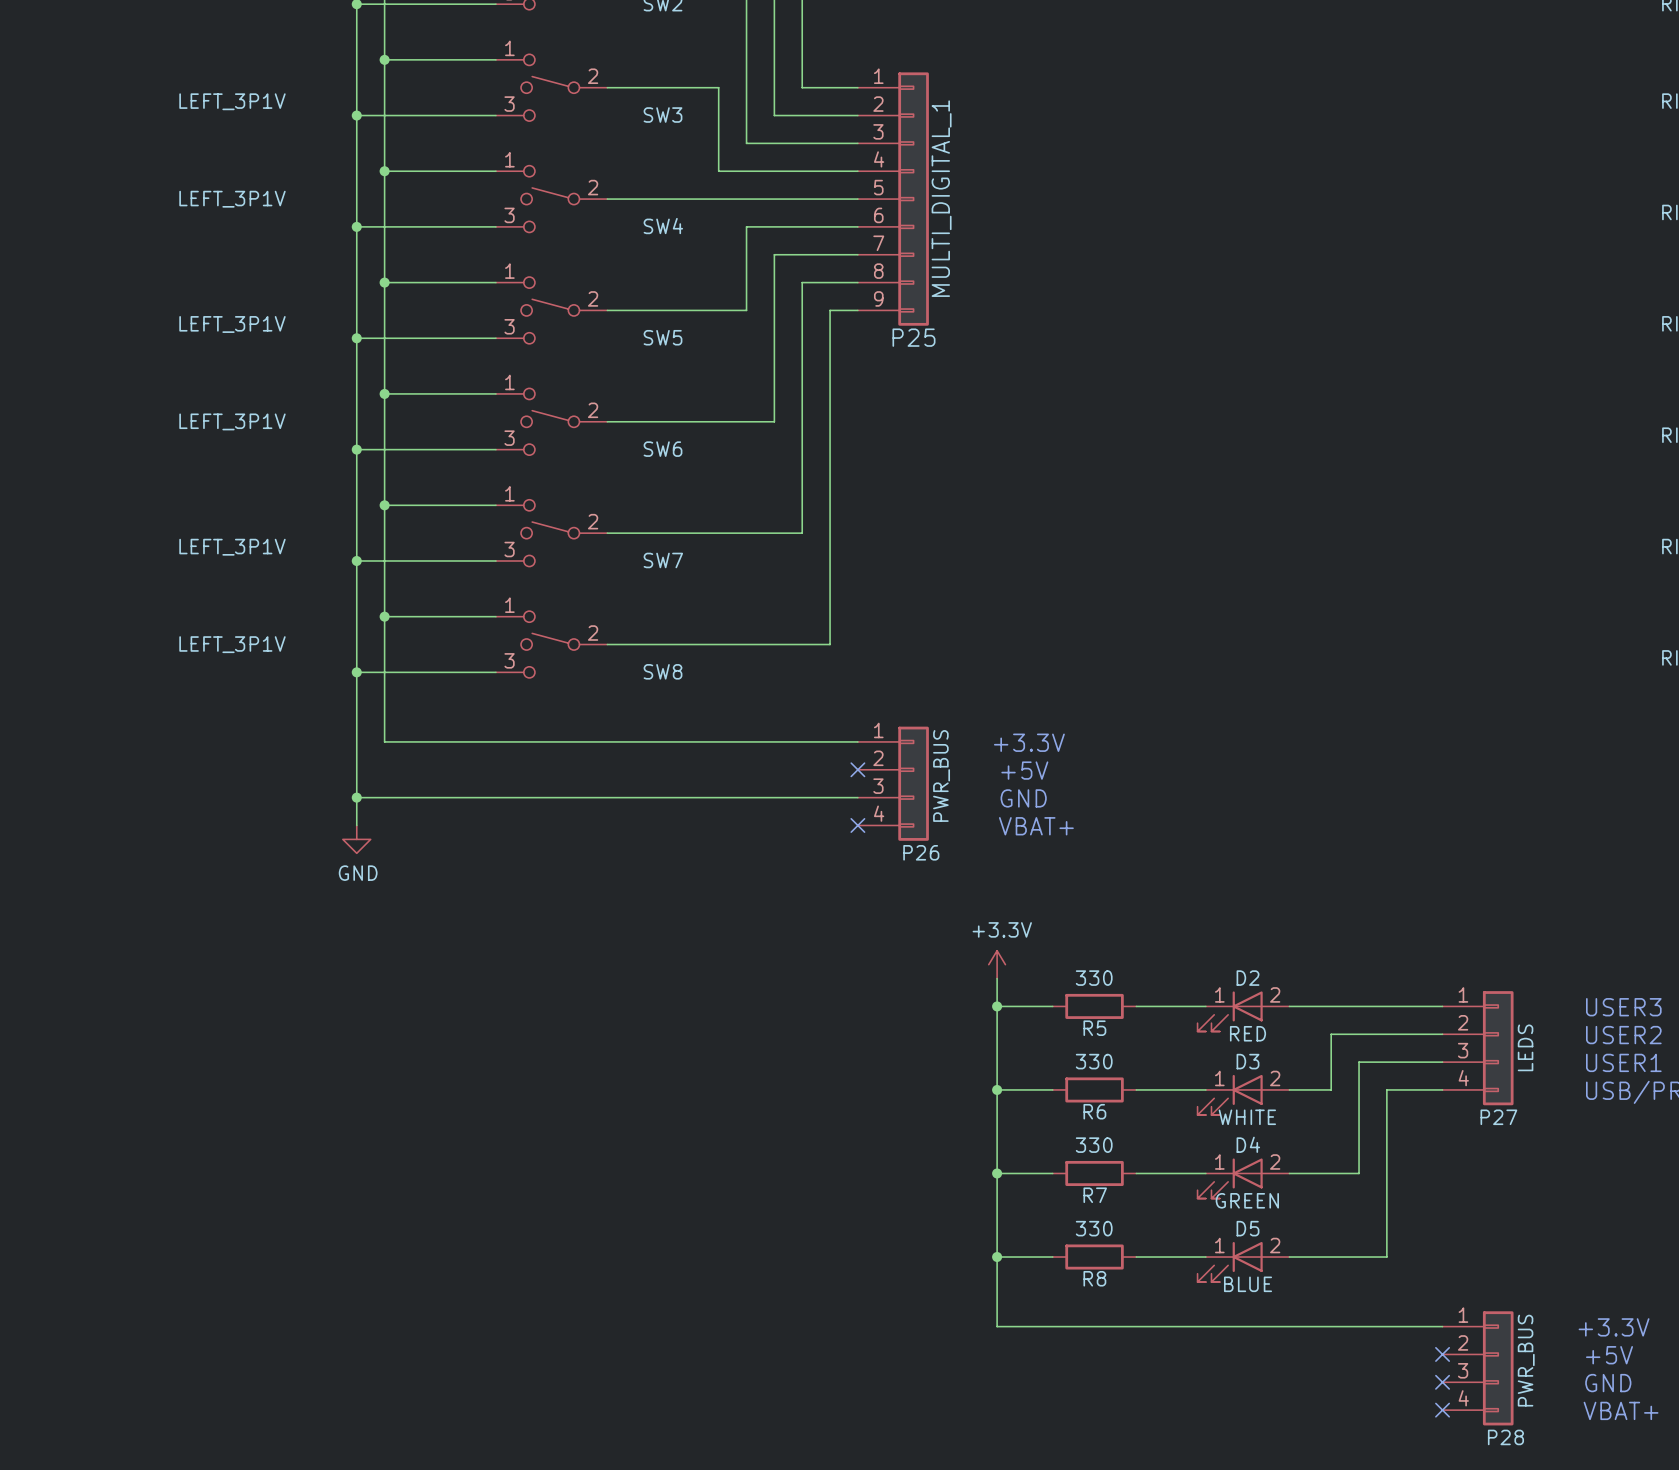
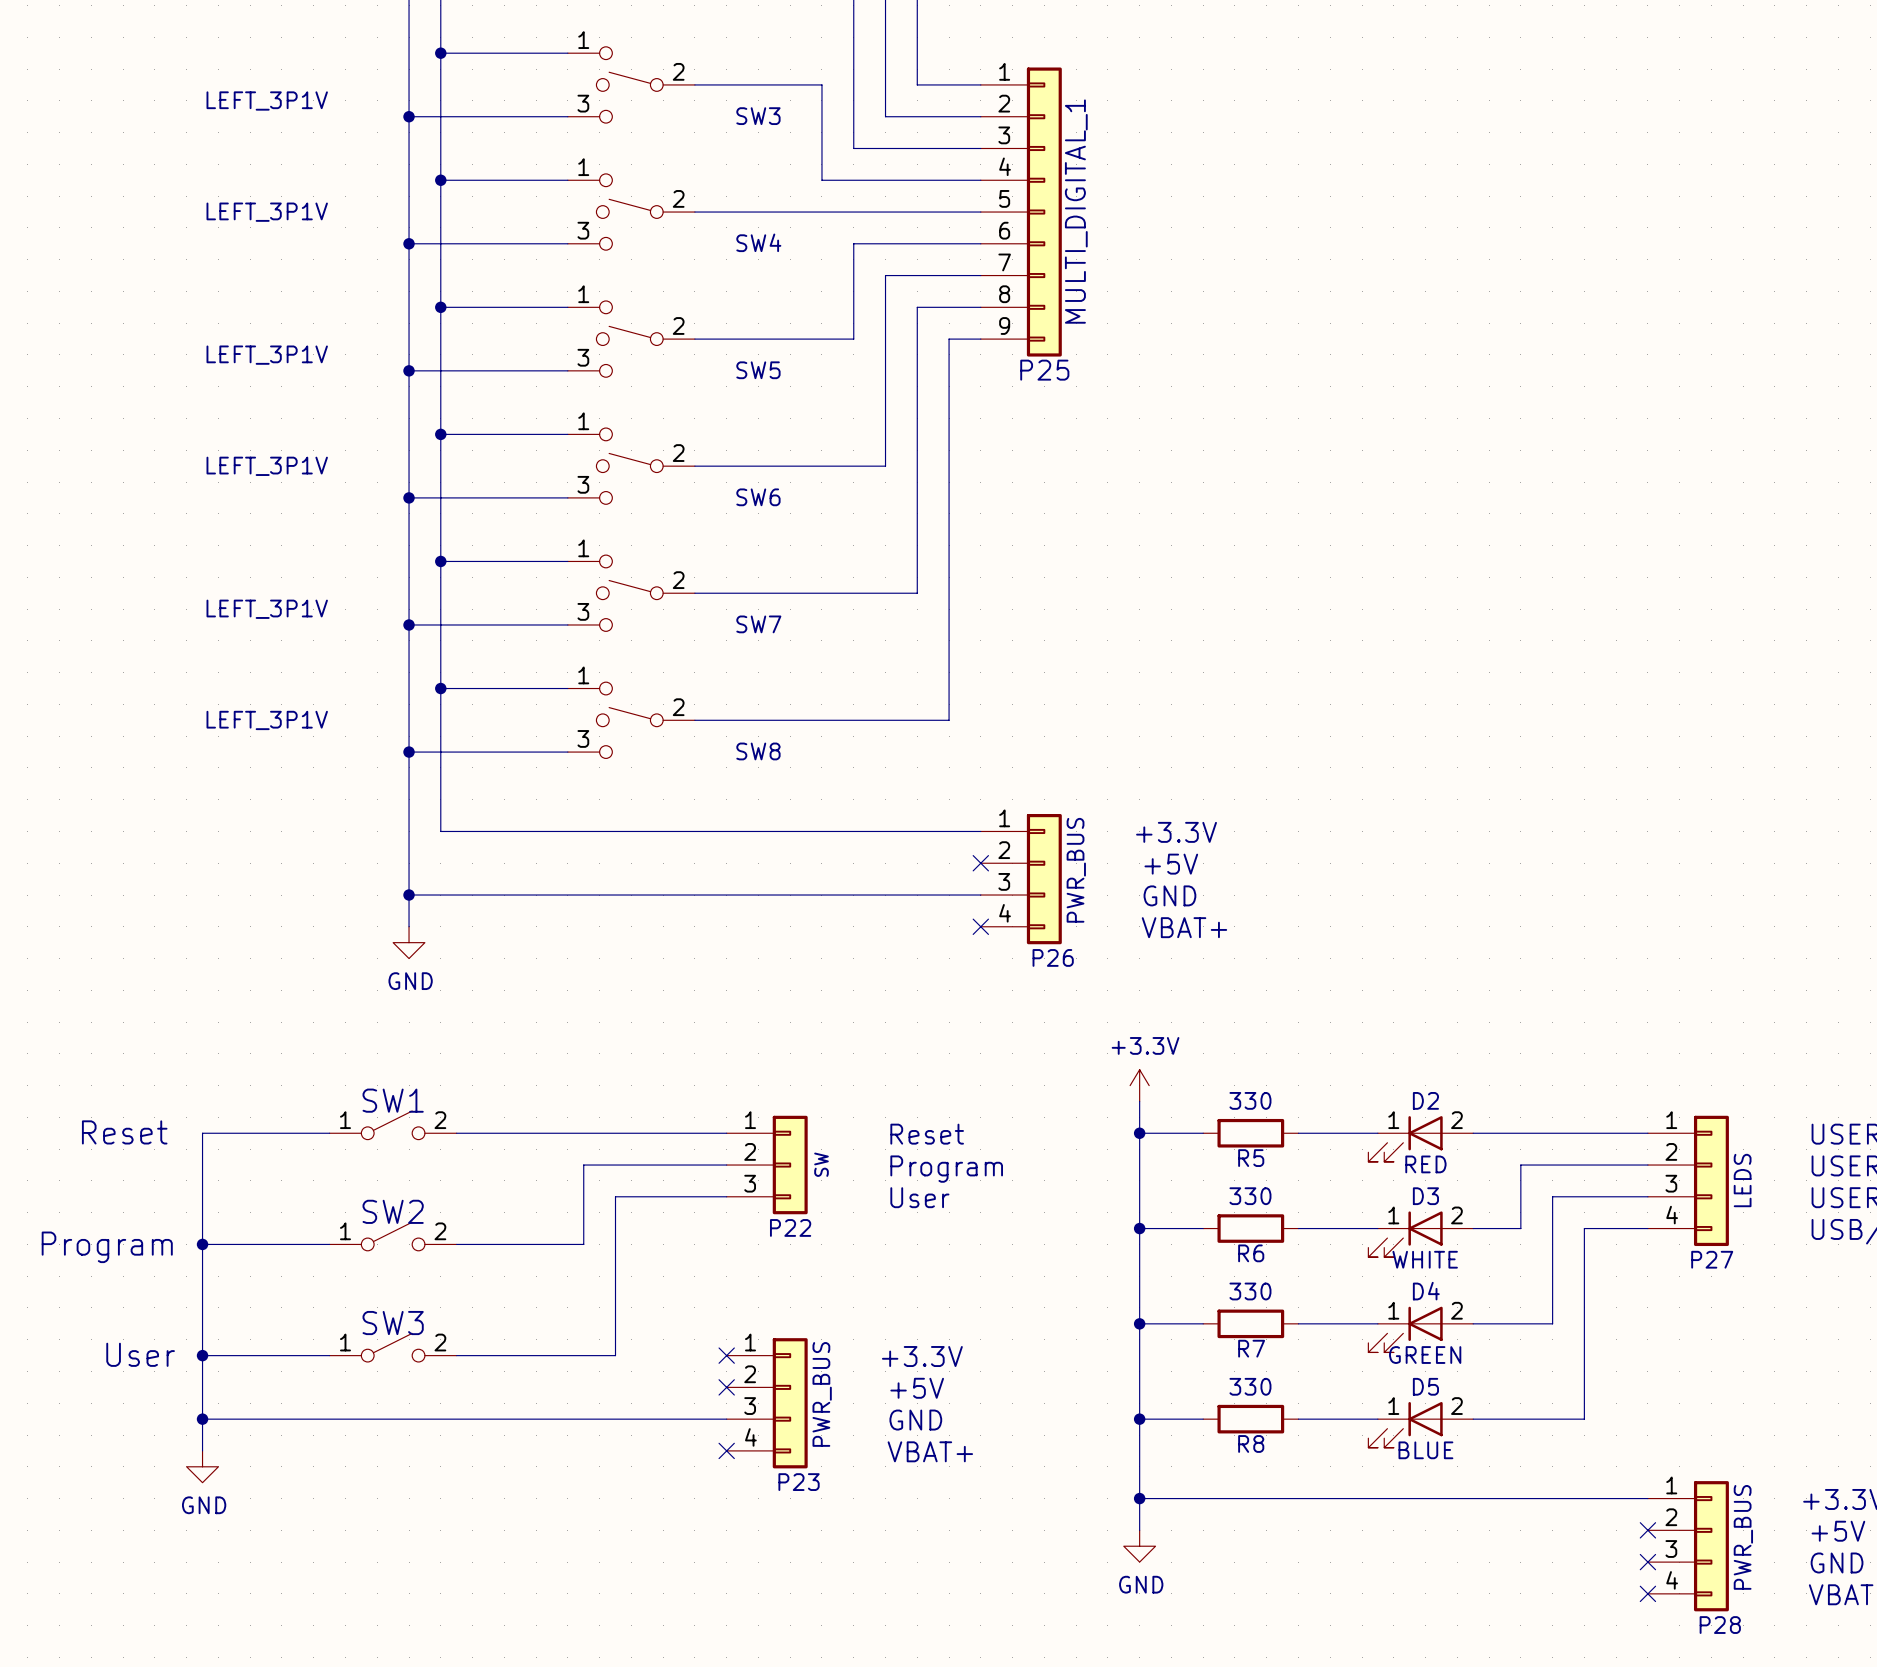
SW1: none -> Reset (393, 1125)
wire: none -> (329, 1133) (202, 1133) (202, 1450)
wire: none -> (456, 1133) (726, 1133)
text: none -> Reset (927, 1134)
wire: none -> (726, 1165) (583, 1165) (583, 1244) (456, 1244)
P22: none -> SW (767, 1165)
text: none -> Program (946, 1169)
wire: none -> (726, 1196) (615, 1196) (615, 1355) (456, 1355)
text: none -> User (919, 1197)
SW2: none -> Program (393, 1236)
wire: none -> (202, 1244) (329, 1244)
junction: none -> (202, 1244)
SW3: none -> User (393, 1347)
wire: none -> (202, 1355) (329, 1355)
junction: none -> (202, 1355)
no-connect mark: none -> (726, 1355)
text: none -> +3.3V (922, 1356)
no-connect mark: none -> (726, 1387)
text: none -> +5V (917, 1388)
P23: none -> PWR_BUS (767, 1403)
wire: none -> (202, 1419) (726, 1419)
junction: none -> (202, 1419)
text: none -> GND (915, 1420)
no-connect mark: none -> (726, 1450)
text: none -> VBAT+ (930, 1451)
power symbol: none -> GND (202, 1466)
wire: none -> (1139, 1498) (1139, 1530)
junction: none -> (1139, 1498)
power symbol: none -> GND (1139, 1546)

